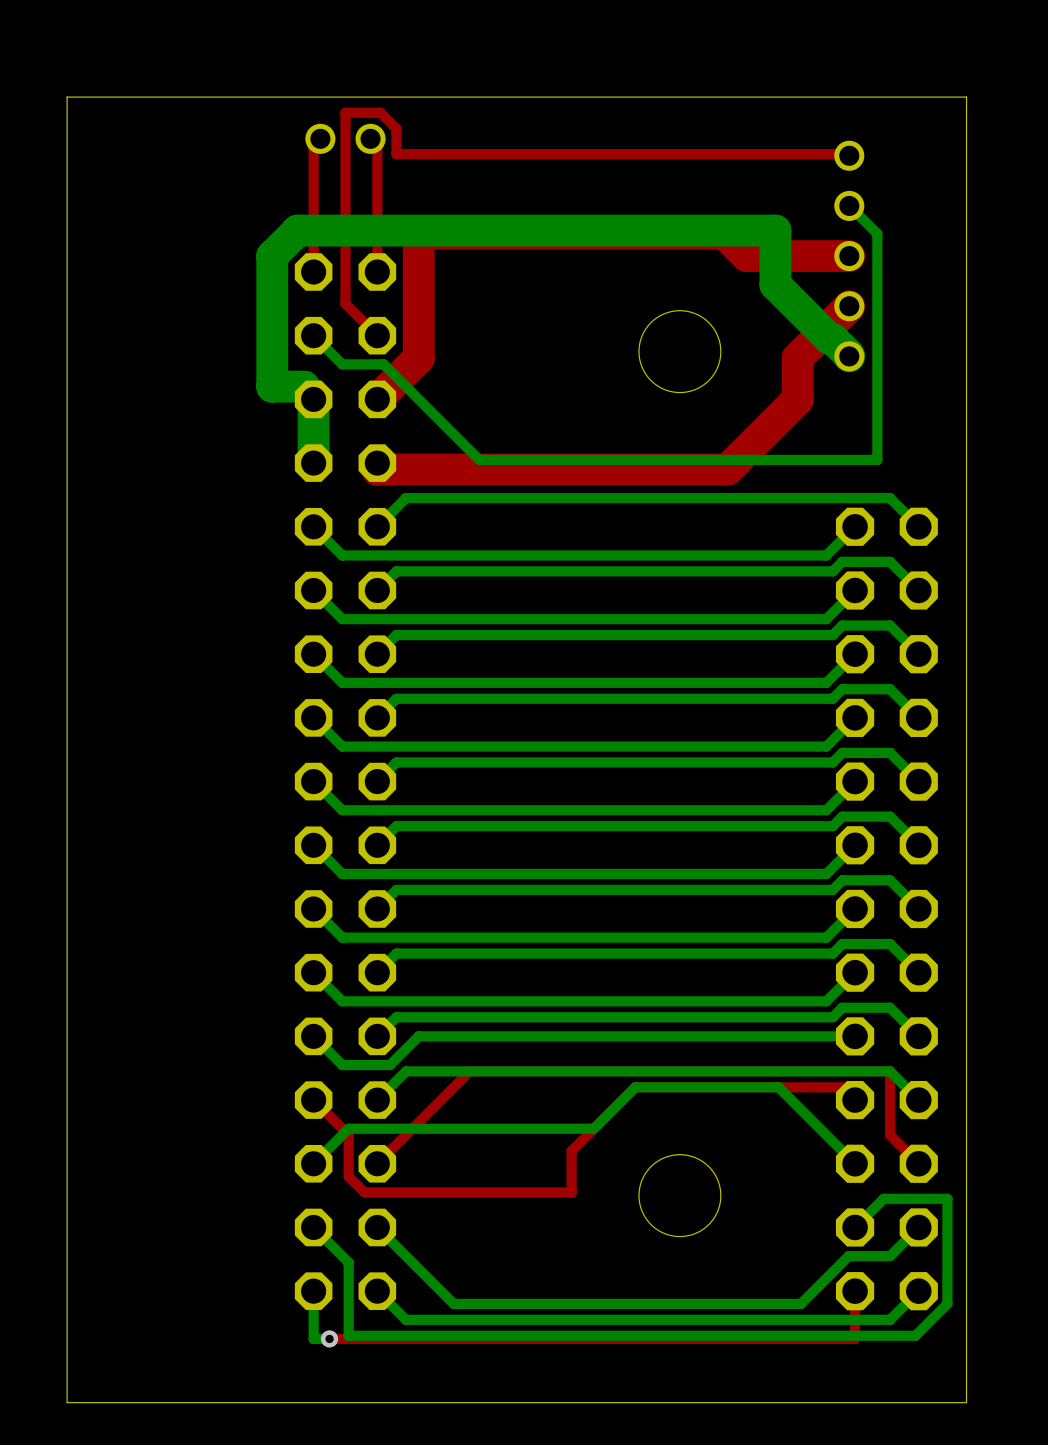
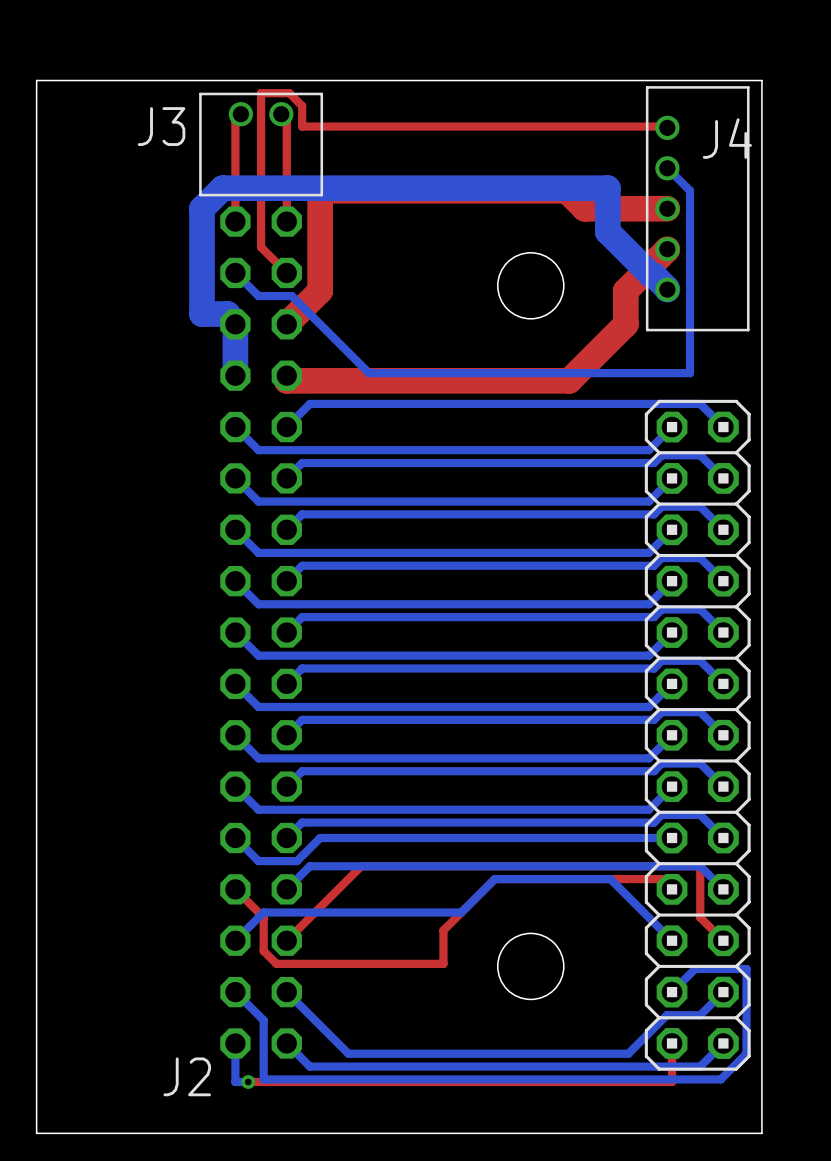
text: none -> J3 (161, 126)
text: none -> J4 (727, 138)
part: none -> (261, 144)
part: none -> (697, 208)
part footprint: [835, 507, 938, 1311] -> [644, 399, 751, 1071]
text: none -> J2 (187, 1076)

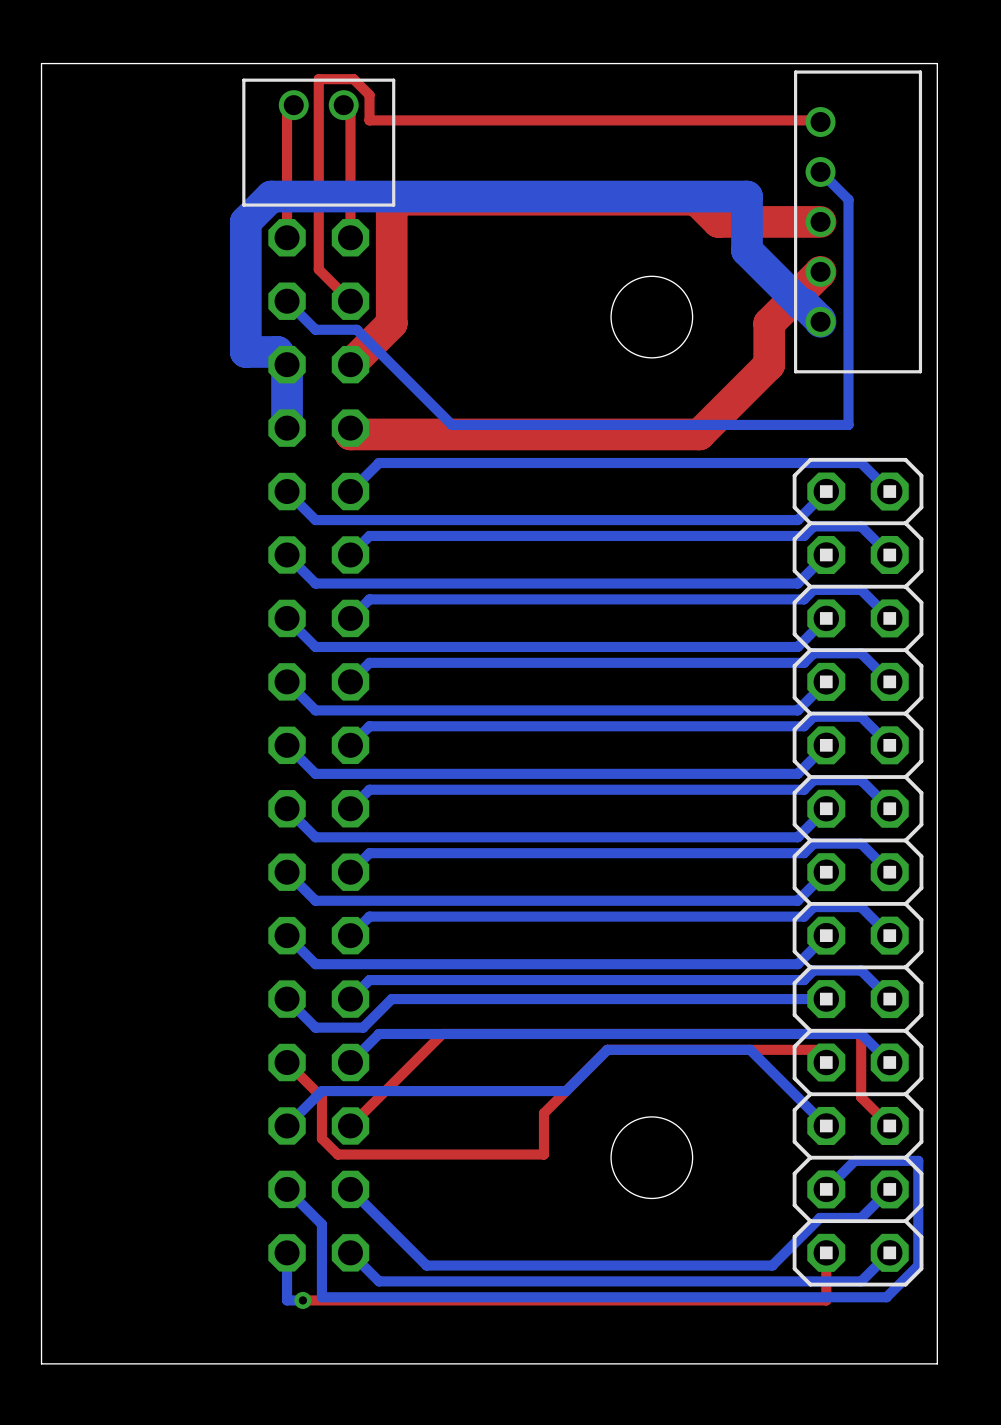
text: J3 (161, 126) -> none
text: J4 (727, 138) -> none
text: J2 (187, 1076) -> none

